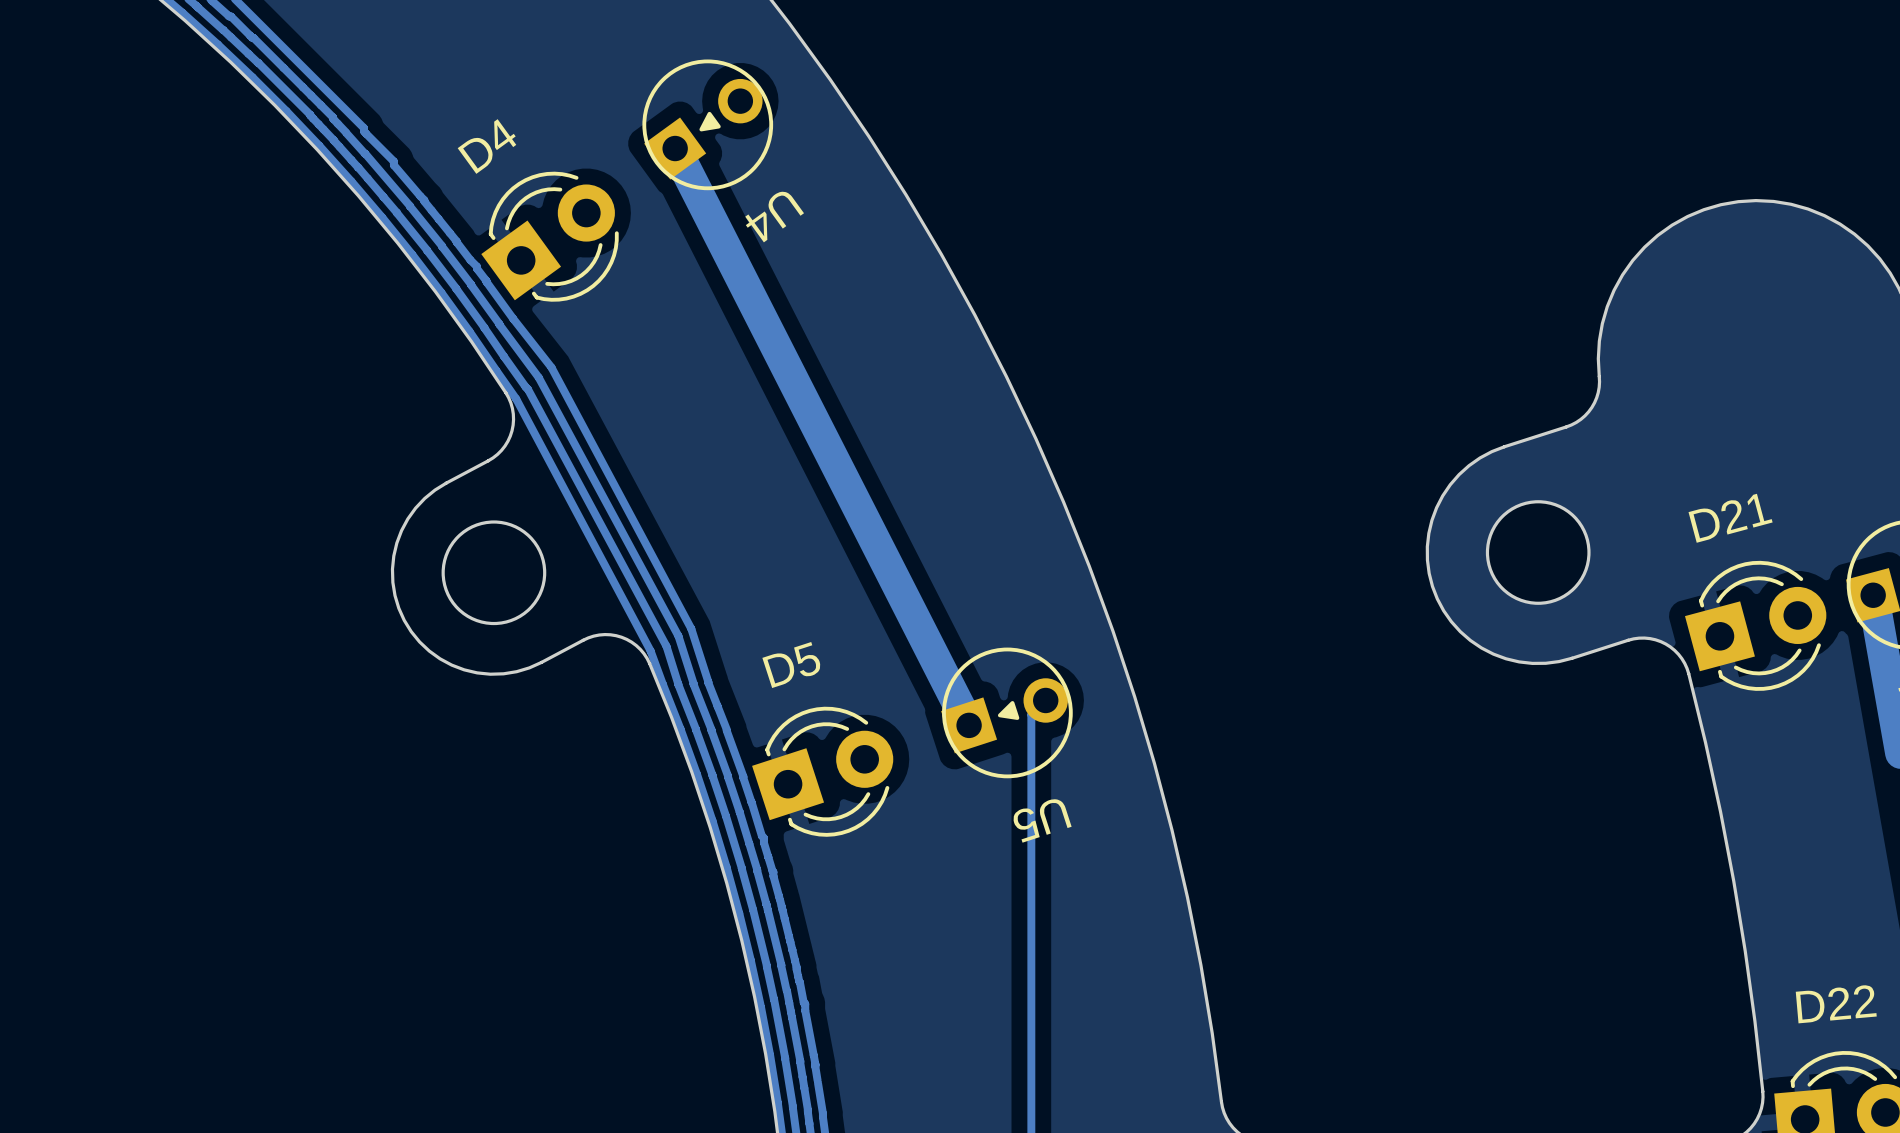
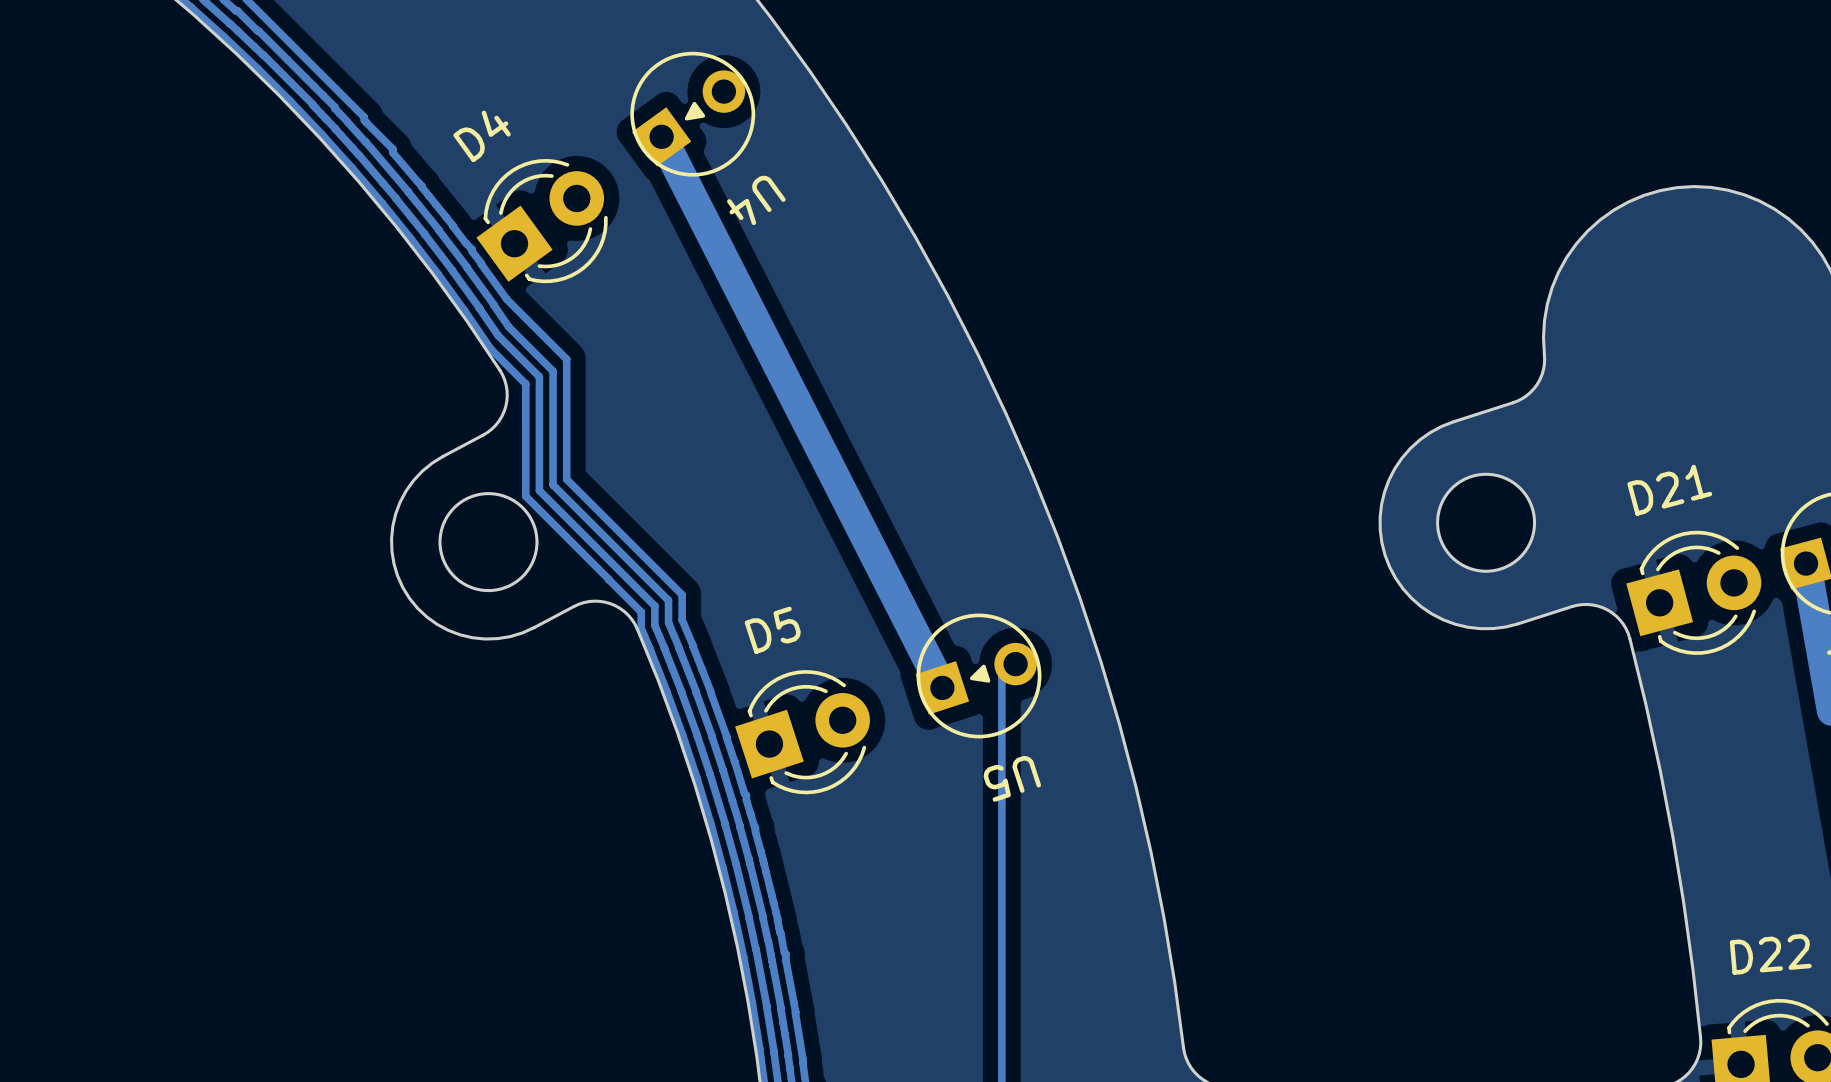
track: (513, 318) (551, 367) (691, 628) (708, 681) -> (506, 299) (566, 359) (566, 479) (682, 594) (682, 619) (693, 646)
track: (499, 324) (538, 377) (678, 636) (693, 683) -> (493, 305) (508, 326) (553, 371) (553, 484) (668, 600) (668, 622) (679, 648)
track: (504, 356) (527, 389) (666, 646) (678, 684) -> (498, 335) (539, 376) (539, 490) (654, 606) (654, 625) (664, 648)
track: (496, 370) (516, 398) (650, 651) (662, 684) -> (490, 349) (525, 384) (525, 496) (608, 579)
track: none -> (608, 579) (641, 612) (641, 628) (649, 648)

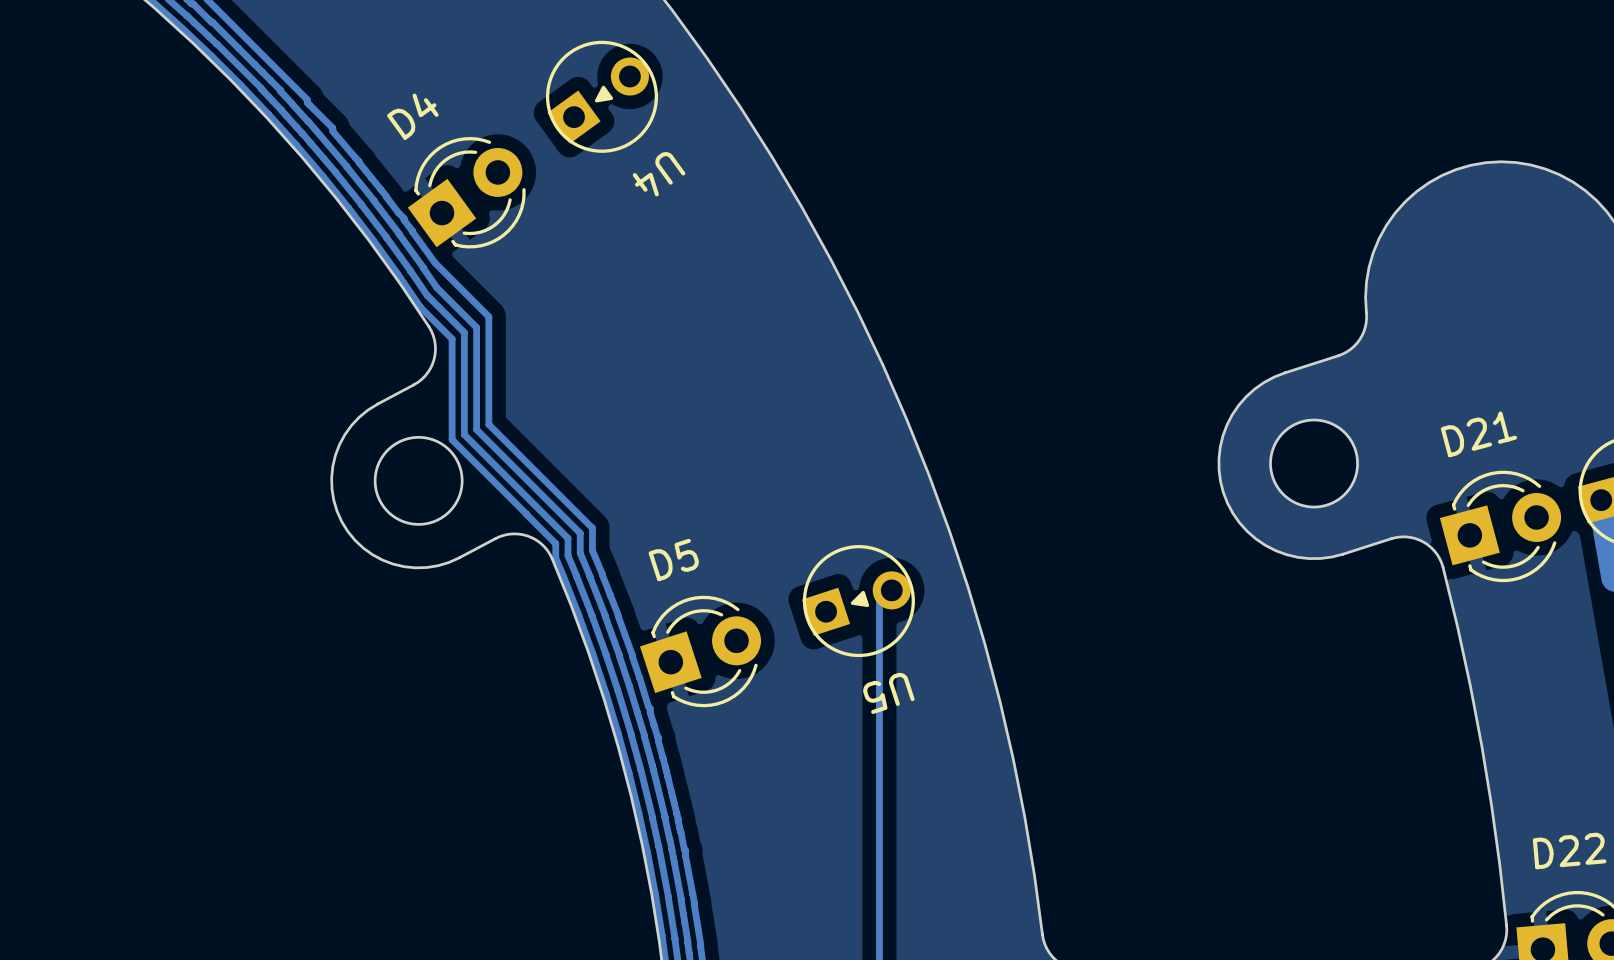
track: (661, 136) (942, 687) -> none

